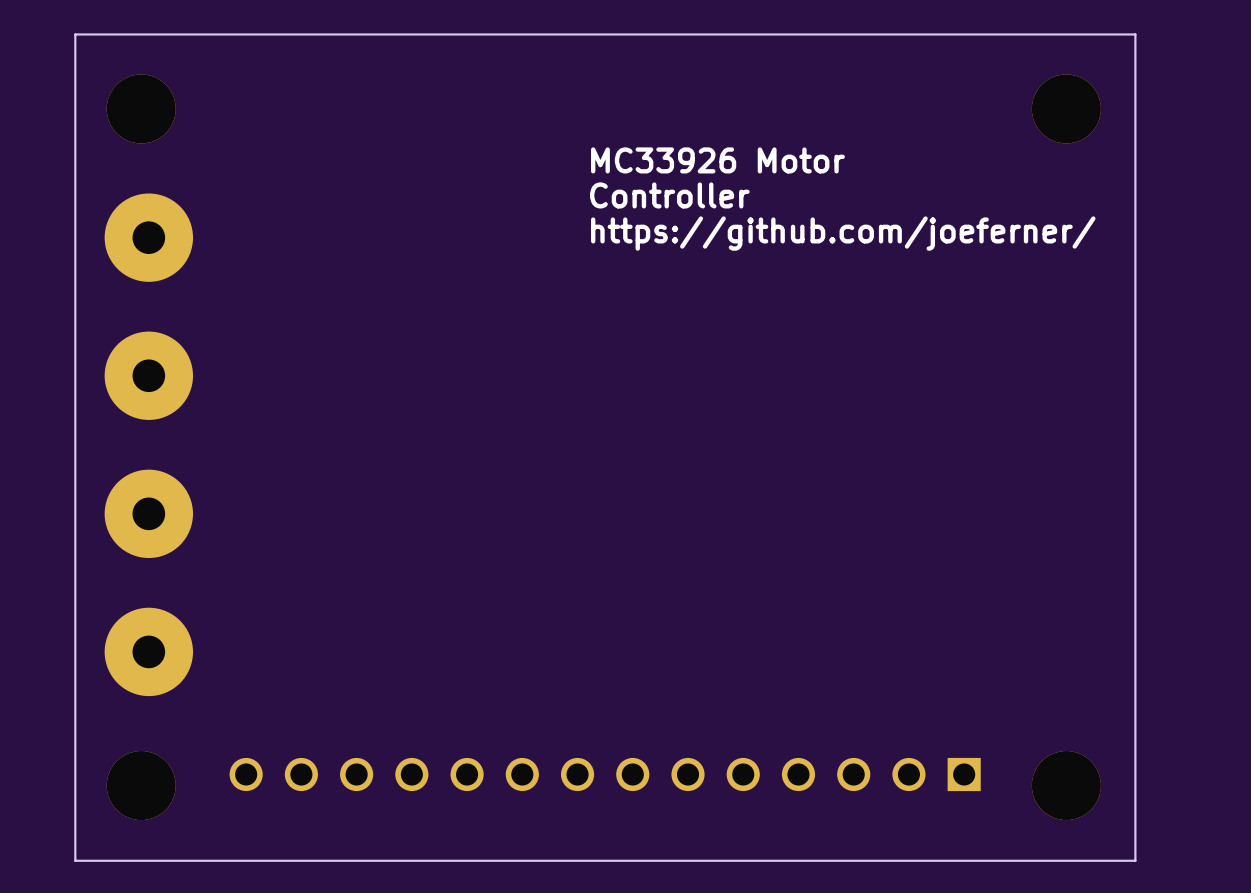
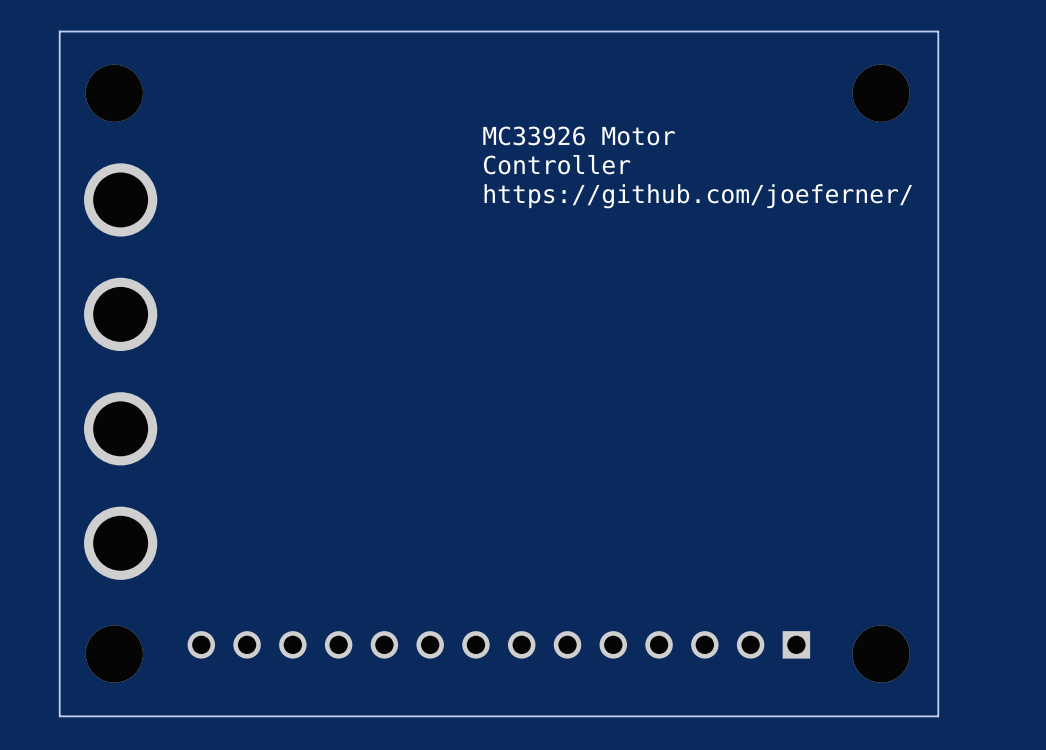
part footprint: [104, 193, 194, 282] -> [84, 163, 158, 237]
part footprint: [104, 331, 194, 420] -> [84, 277, 158, 352]
part footprint: [104, 469, 194, 559] -> [84, 392, 158, 466]
part footprint: [104, 607, 194, 697] -> [84, 506, 158, 580]

